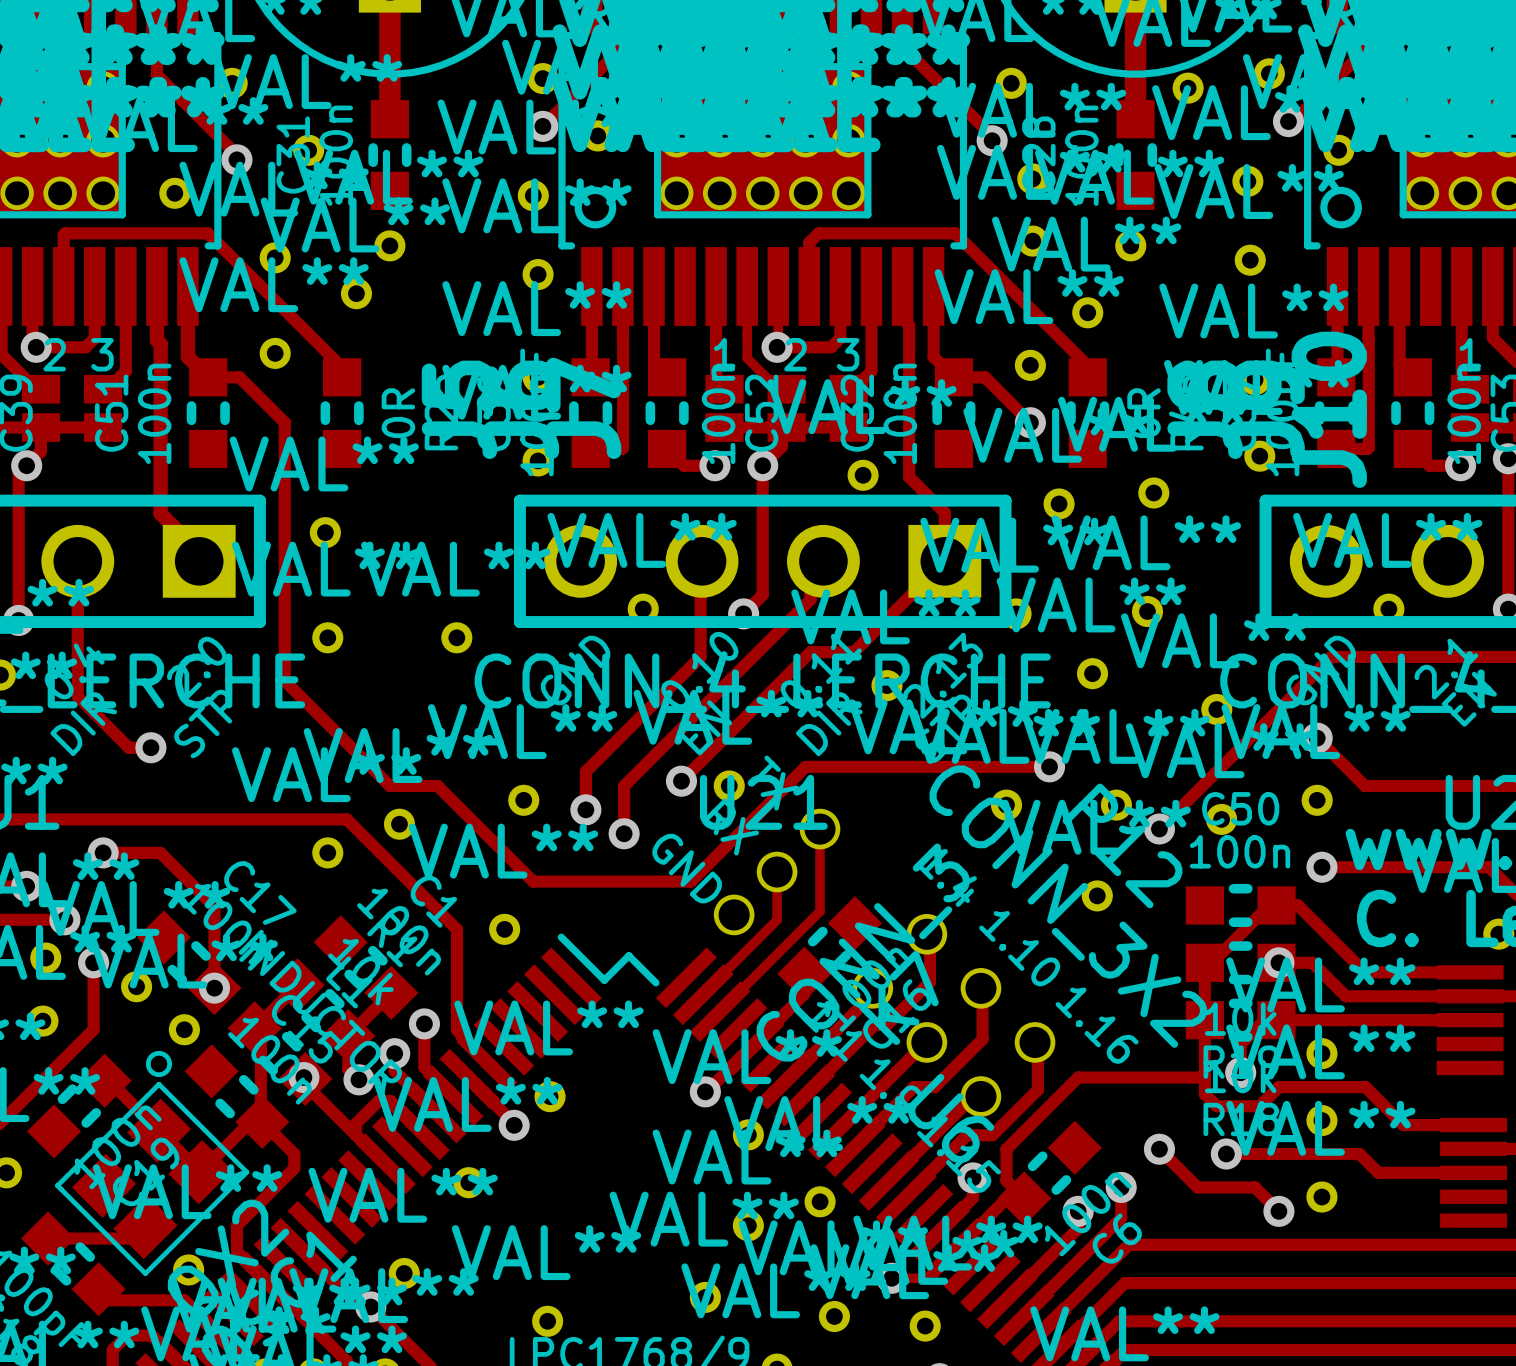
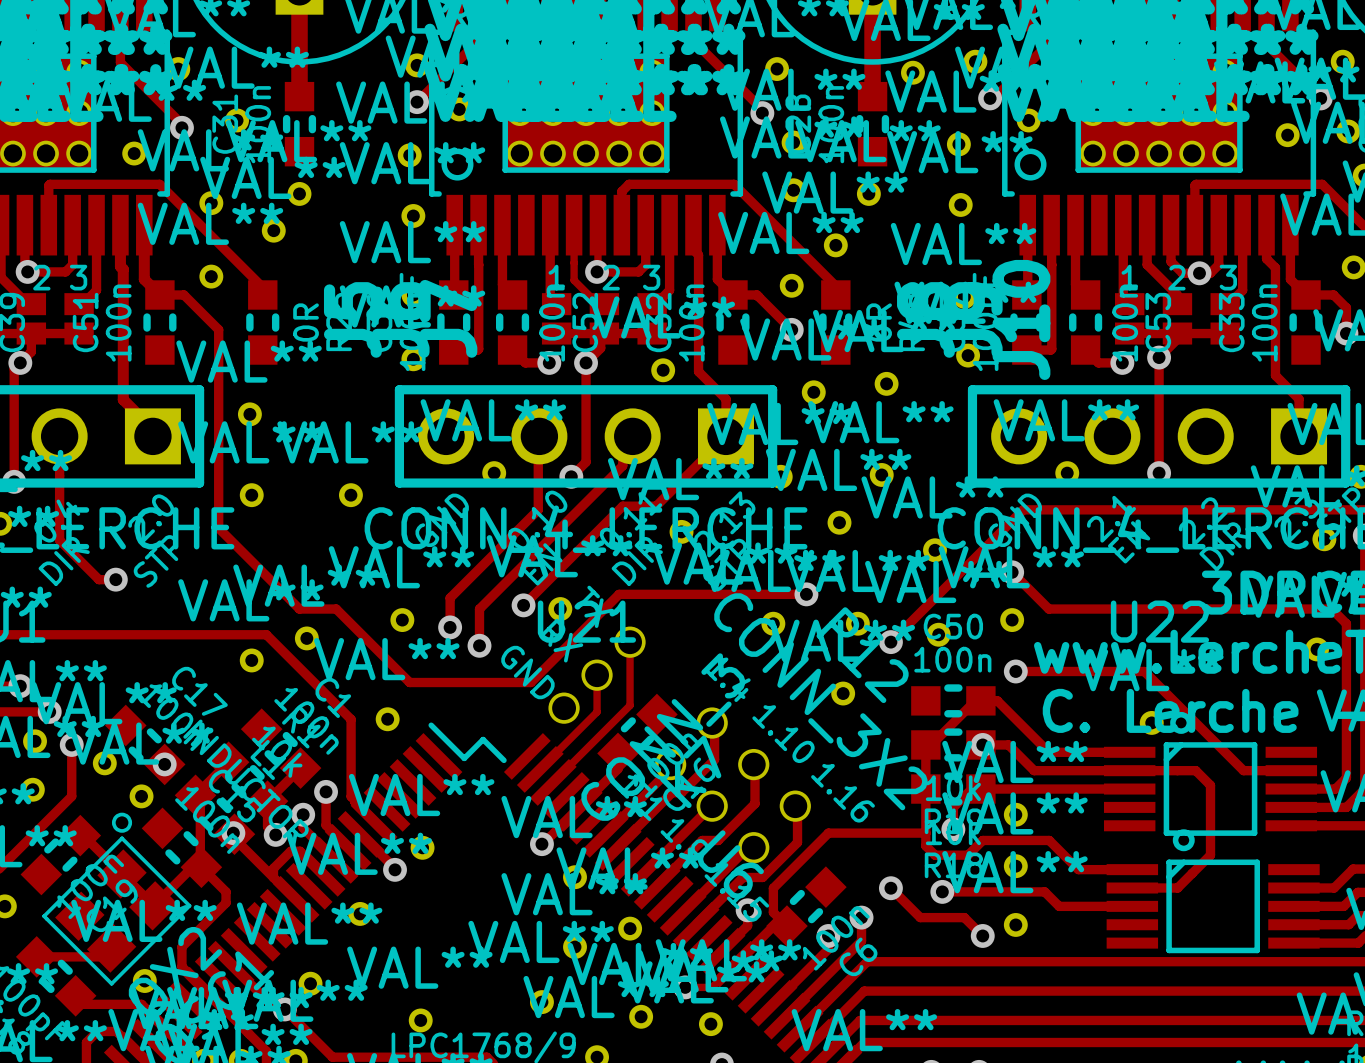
track: (103, 852) (160, 852) (214, 906) (214, 988) -> none
via: (103, 852) -> none

